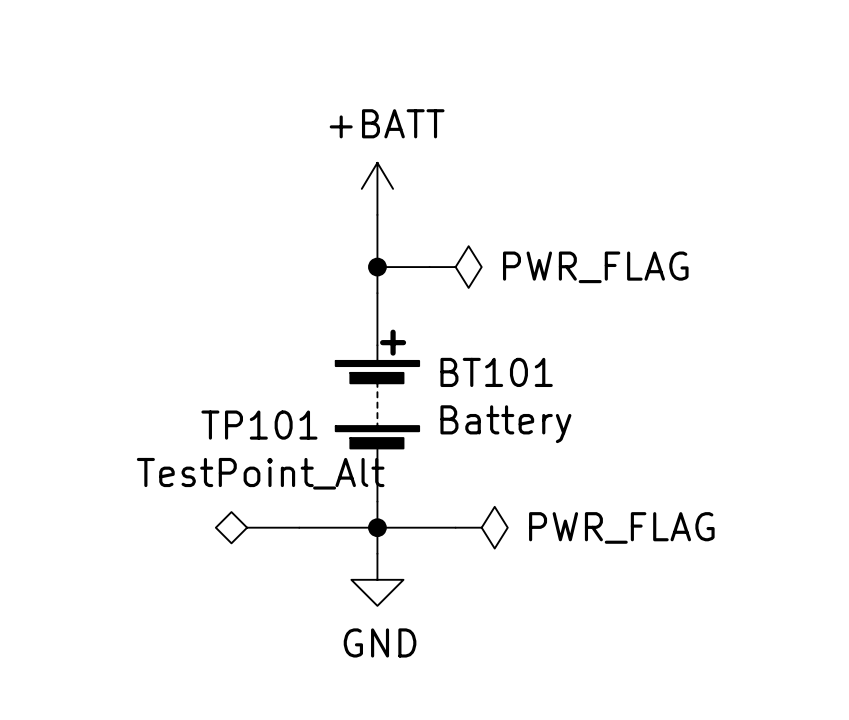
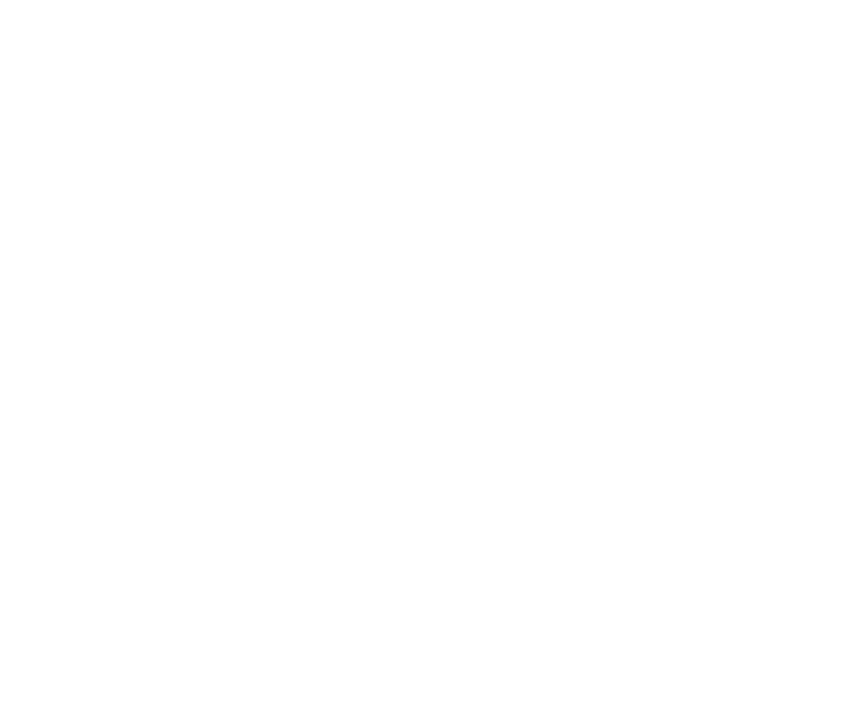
power symbol: +BATT (377, 188) -> none
wire: (377, 214) (377, 293) -> none
wire: (377, 267) (429, 267) -> none
junction: (377, 267) -> none
power symbol: PWR_FLAG (455, 267) -> none
BT101: Battery (377, 397) -> none
wire: (377, 501) (377, 553) -> none
TP101: TestPoint_Alt (257, 527) -> none
wire: (299, 527) (455, 527) -> none
junction: (377, 527) -> none
power symbol: PWR_FLAG (481, 527) -> none
power symbol: GND (377, 579) -> none

